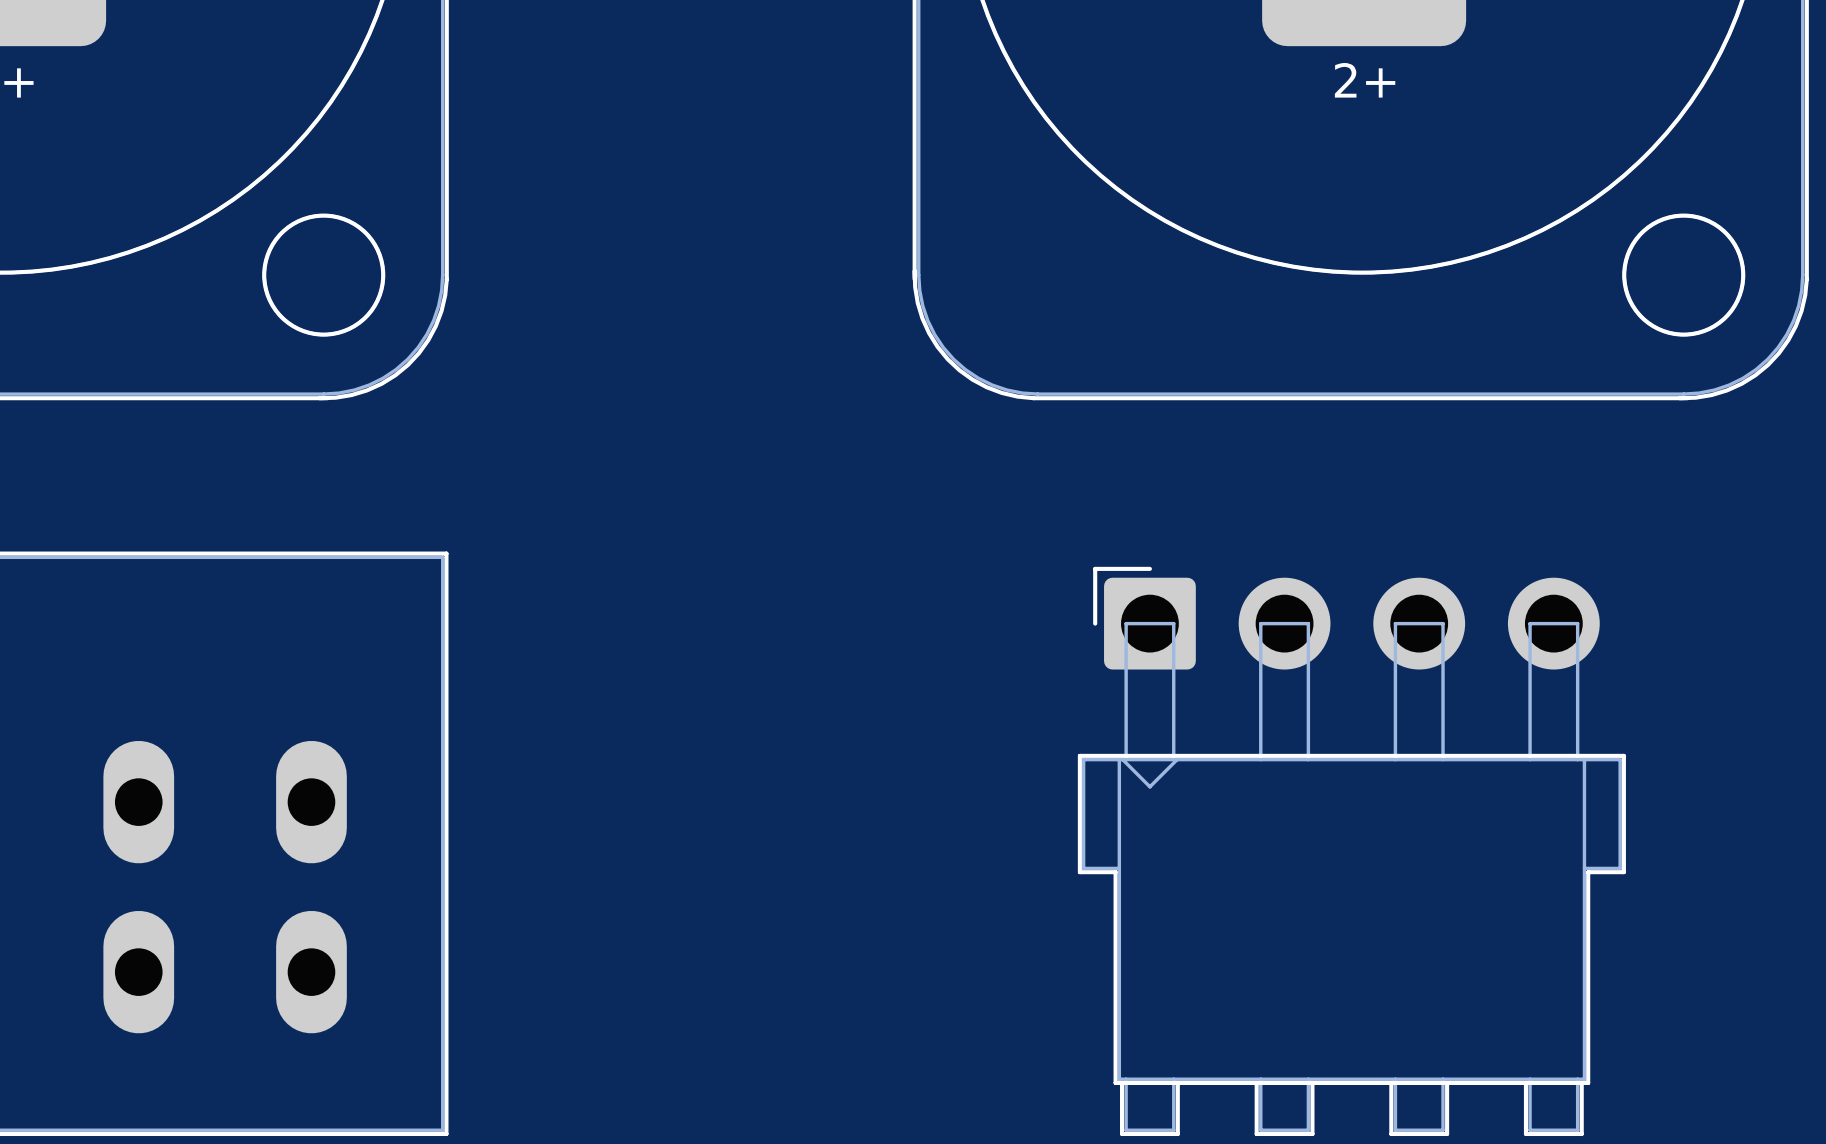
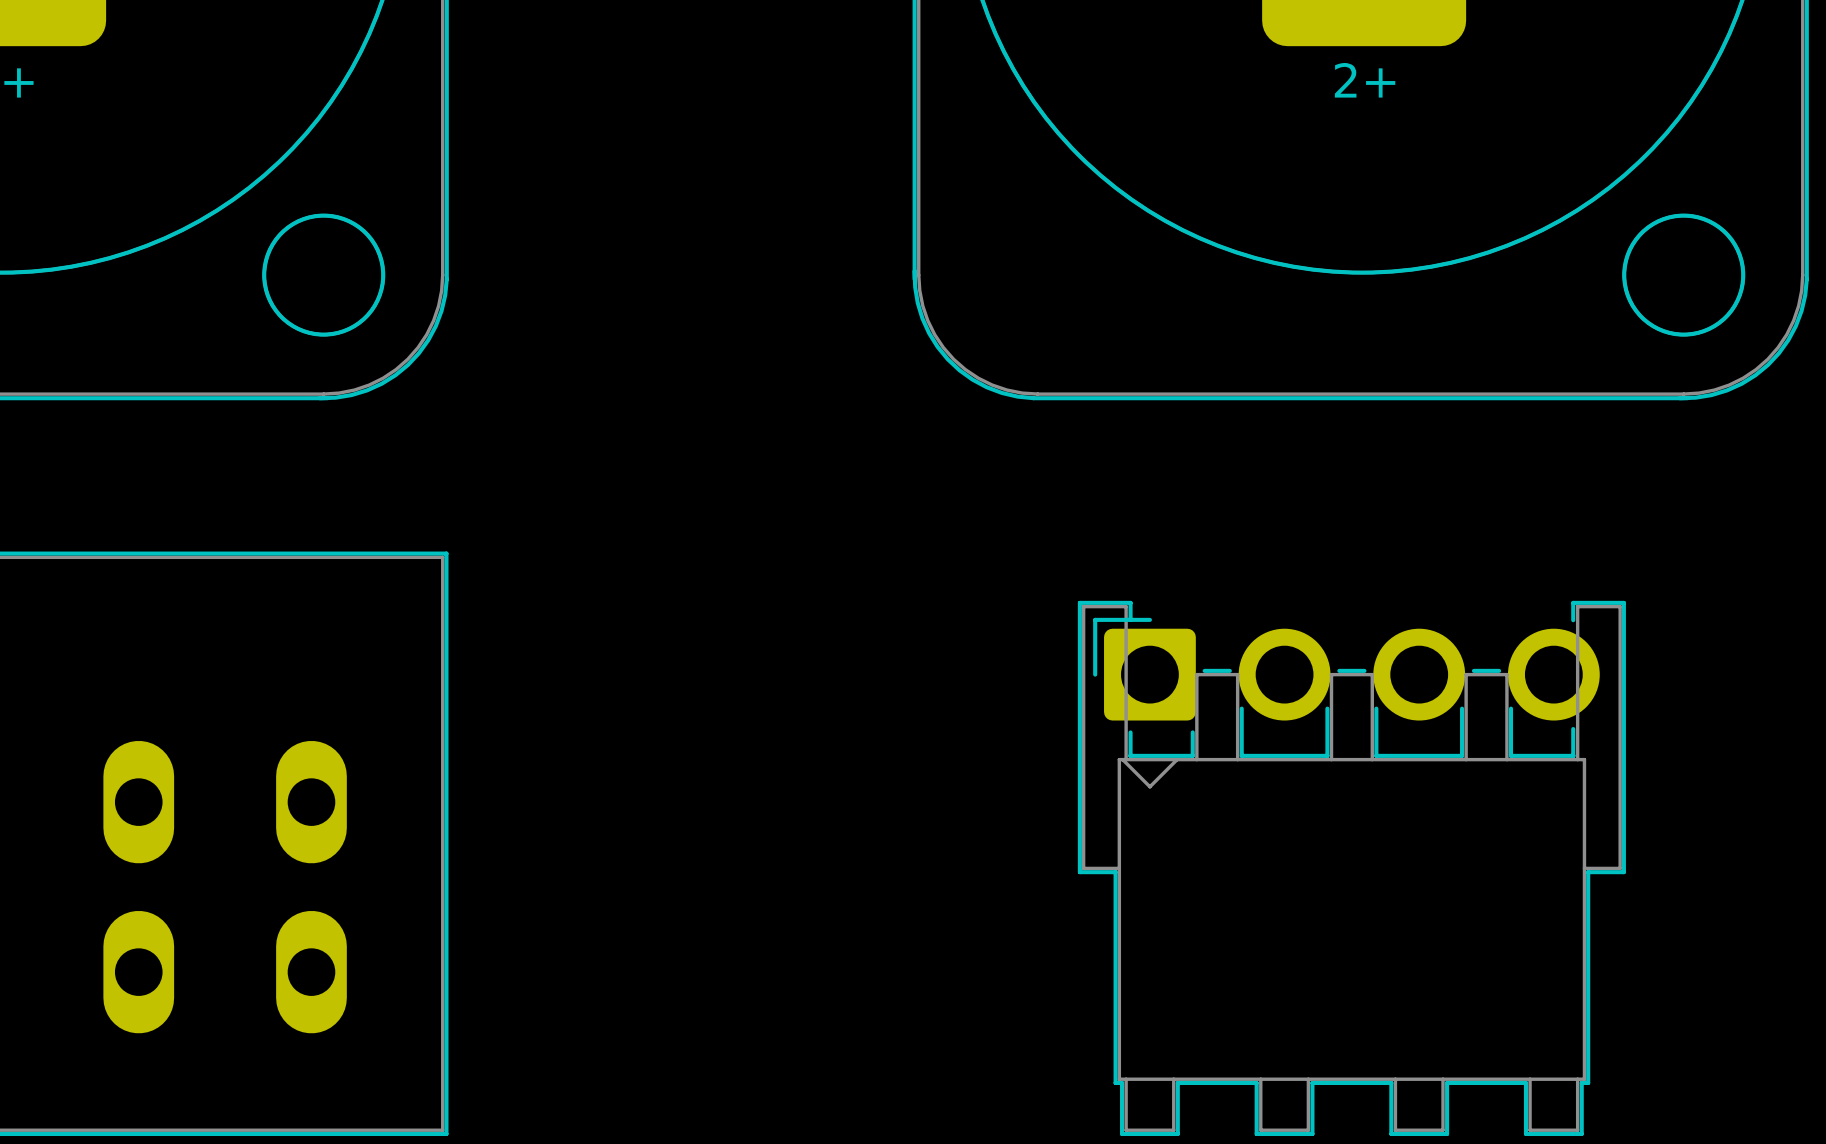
part footprint: [1077, 566, 1626, 1137] -> [1077, 600, 1626, 1137]

